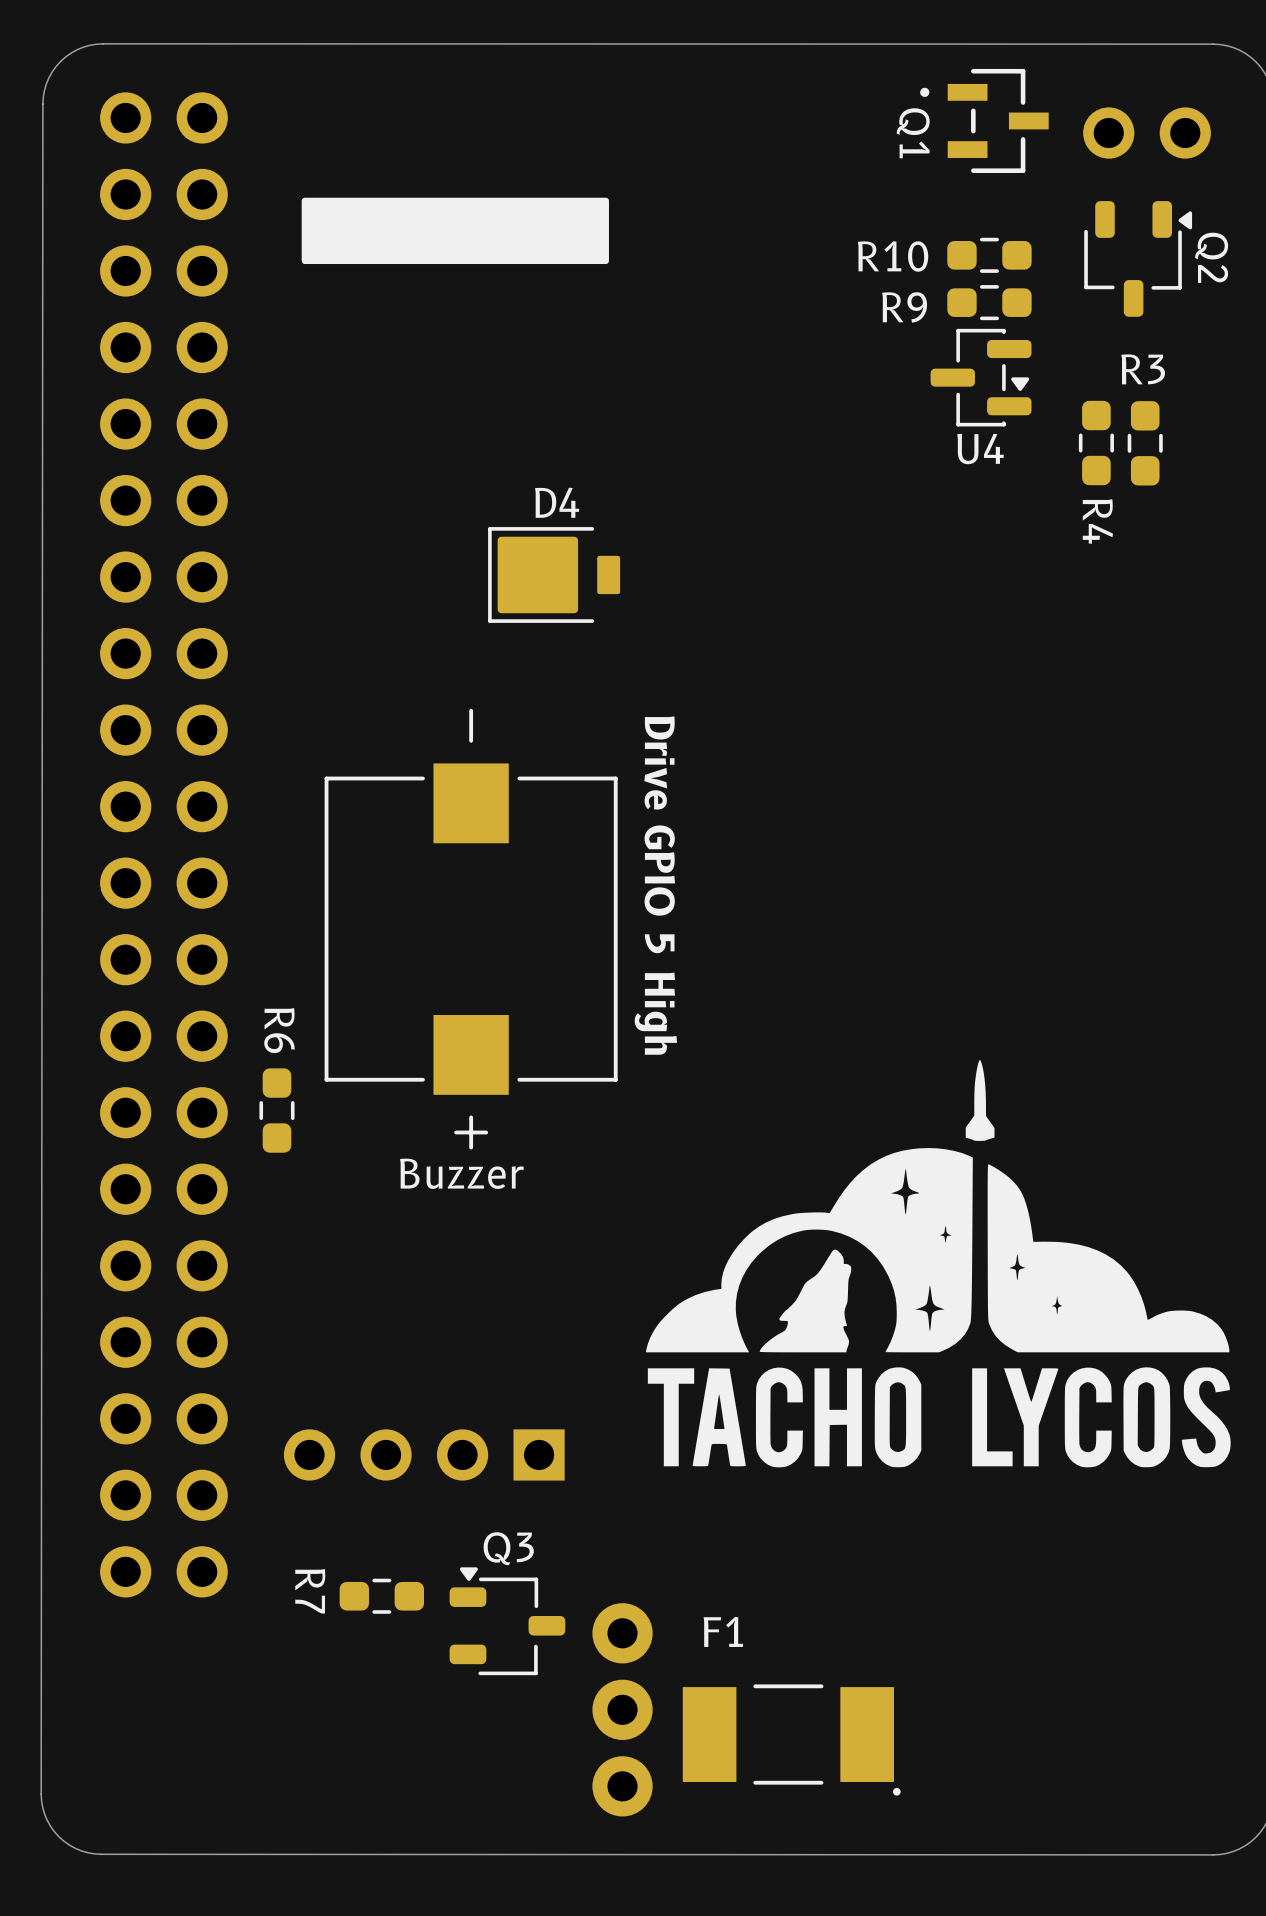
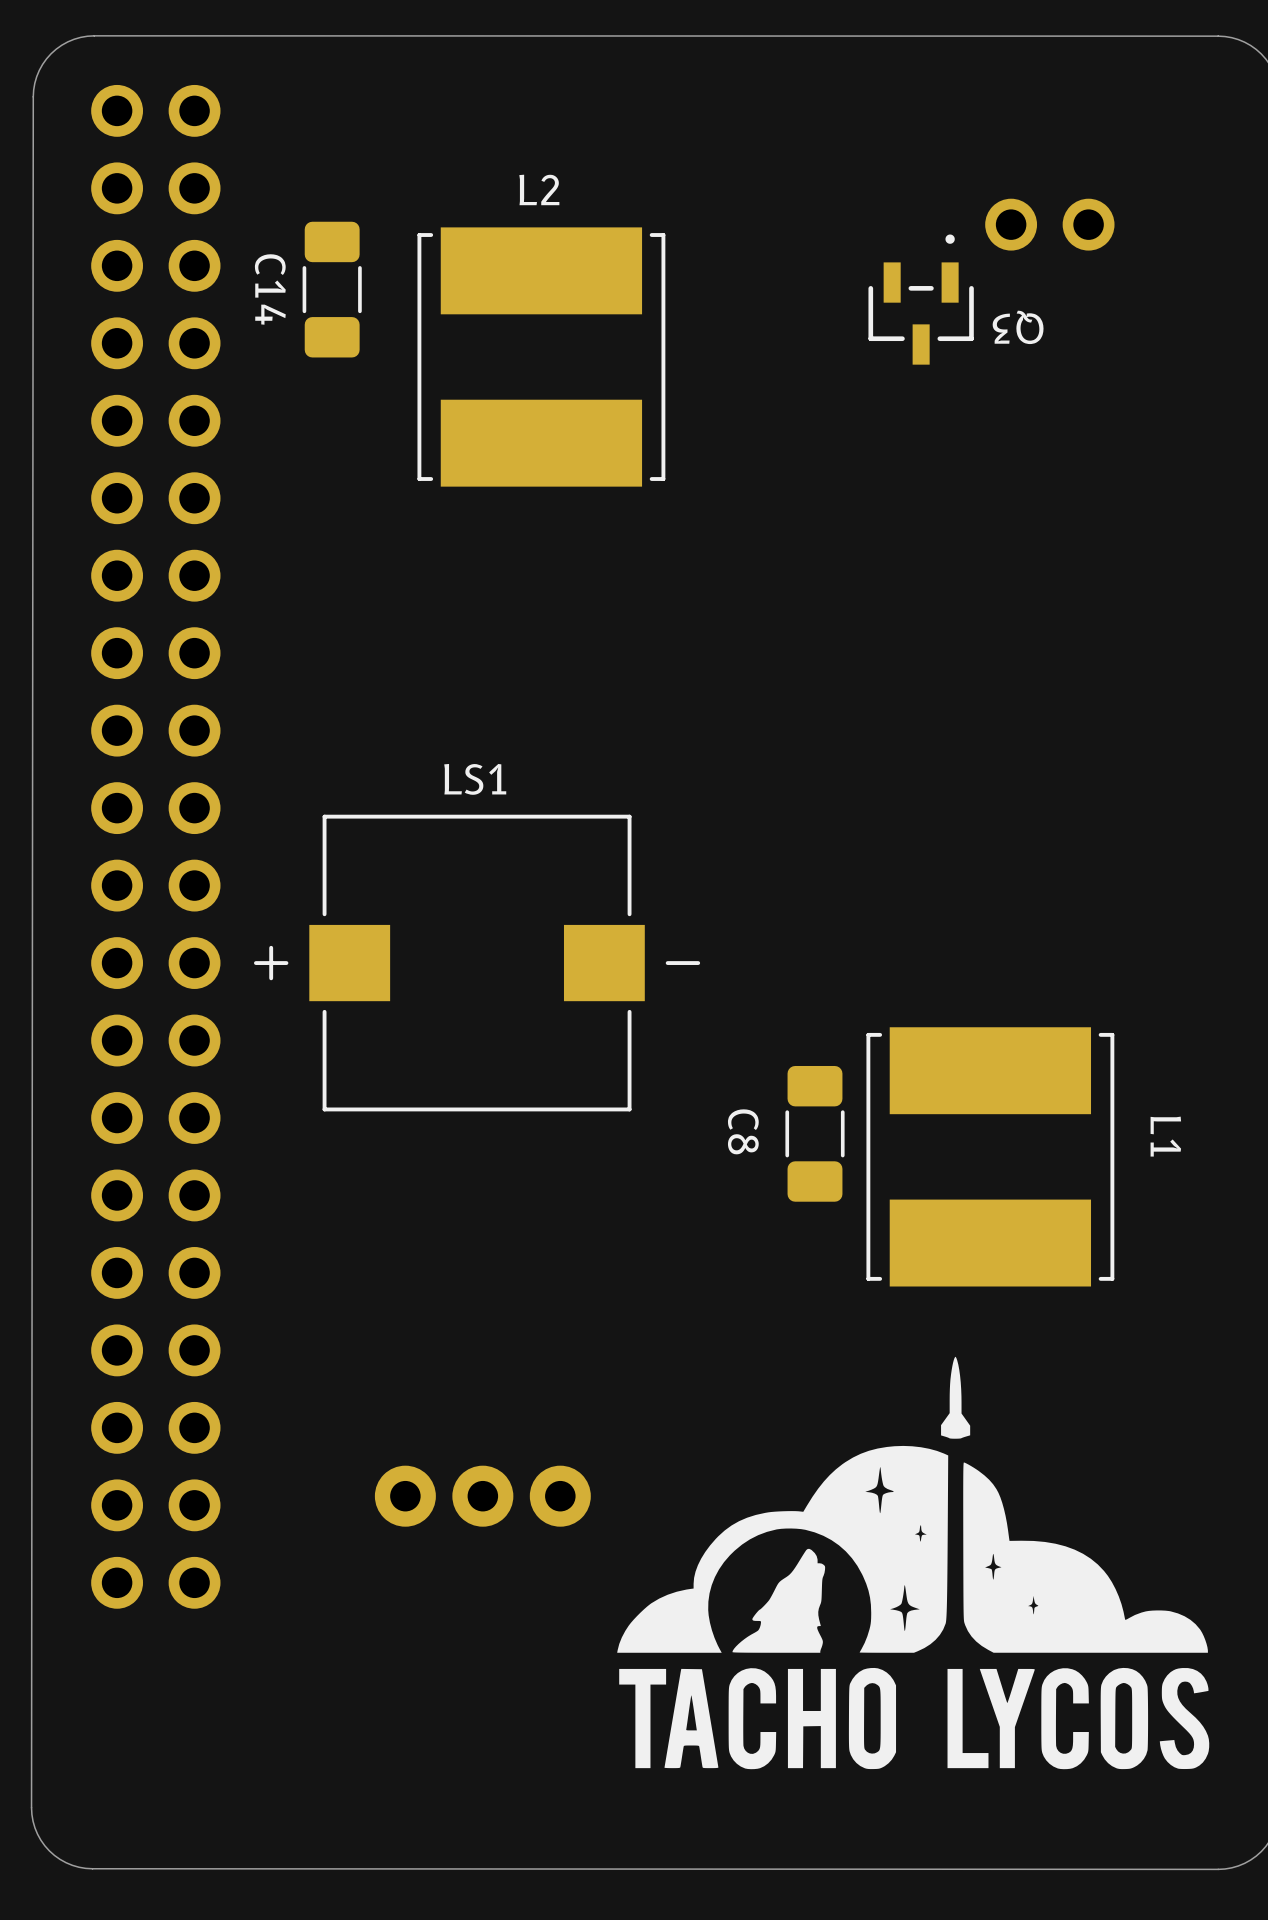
Q1: (984, 120) -> none
part position: (1147, 133) -> (1049, 224)
drawing: [301, 197, 609, 265] -> none
R10: (989, 255) -> none
Q2: (1138, 258) -> none
C14: none -> (332, 289)
R9: (989, 302) -> none
L2: none -> (541, 357)
U4: (981, 377) -> none
R4: (1096, 443) -> none
R3: (1145, 443) -> none
D4: (554, 574) -> none
text: Drive GPIO 5 High (655, 885) -> none
part: (471, 929) -> none
LS1: none -> (477, 963)
R6: (276, 1110) -> none
C8: none -> (814, 1133)
L1: none -> (990, 1156)
text: Buzzer (461, 1173) -> none
drawing position: (938, 1263) -> (913, 1562)
part: (424, 1454) -> none
Q3 name position: Q3 (508, 1548) -> Q3 (1018, 327)
Q3 footprint: [449, 1567, 566, 1676] -> [868, 234, 974, 365]
R7: (381, 1596) -> none
part rotation: 0° (622, 1709) -> 90° clockwise (482, 1496)
part position: (622, 1709) -> (482, 1496)
F1: (791, 1740) -> none

